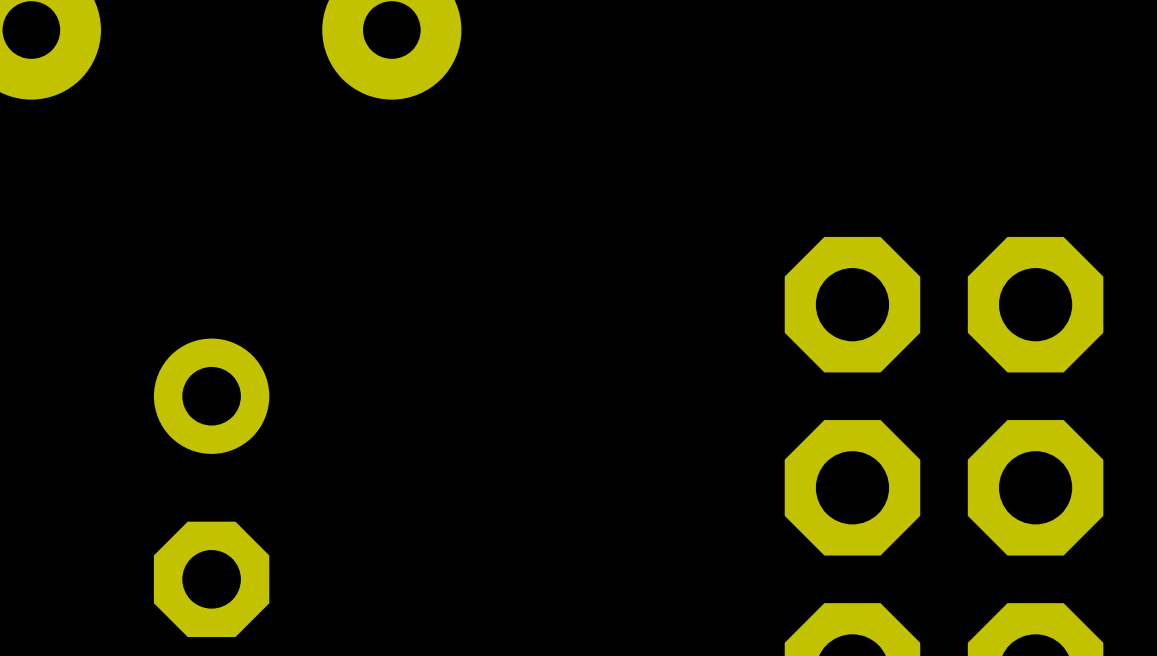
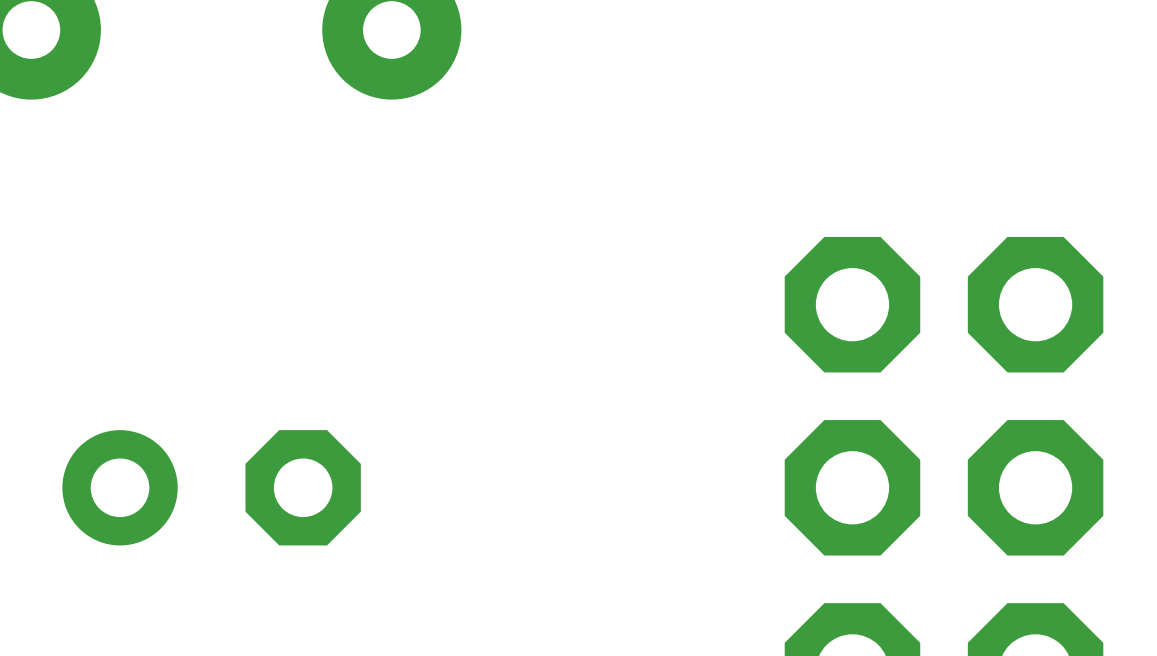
part rotation: 0° (211, 487) -> 90° counterclockwise (211, 487)

